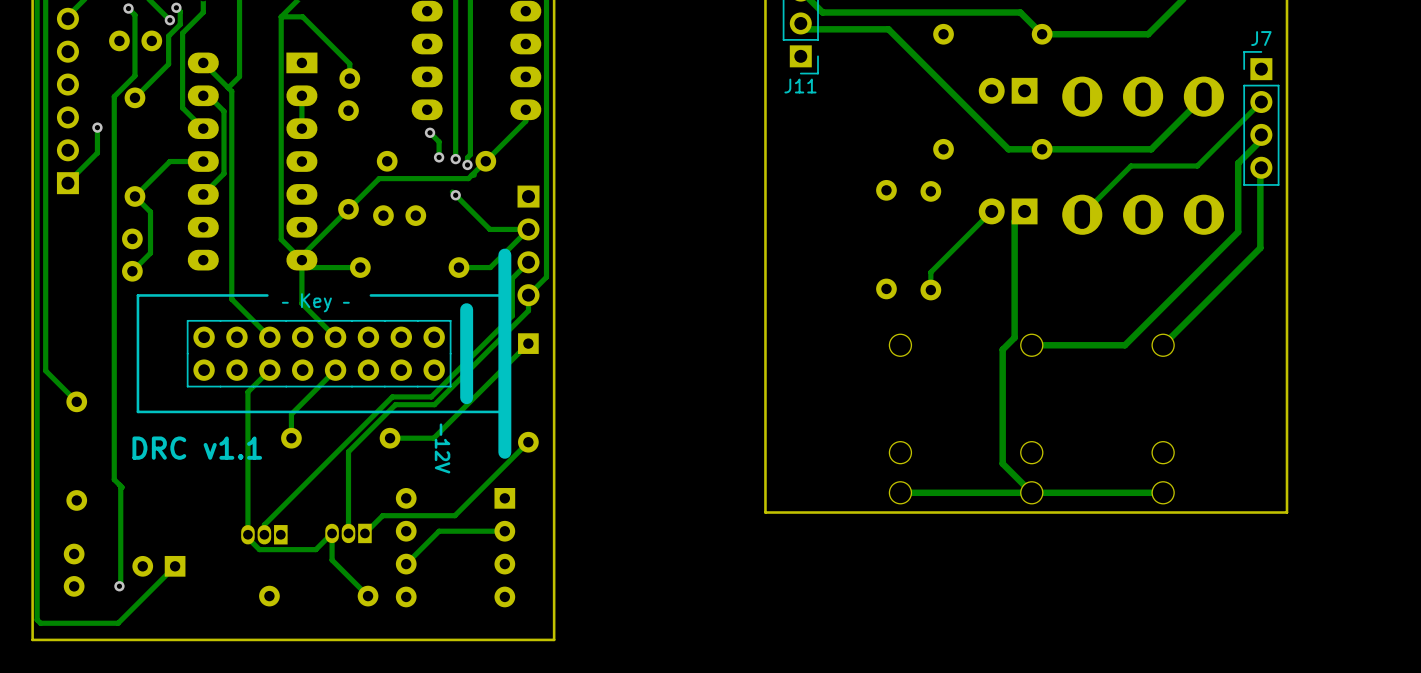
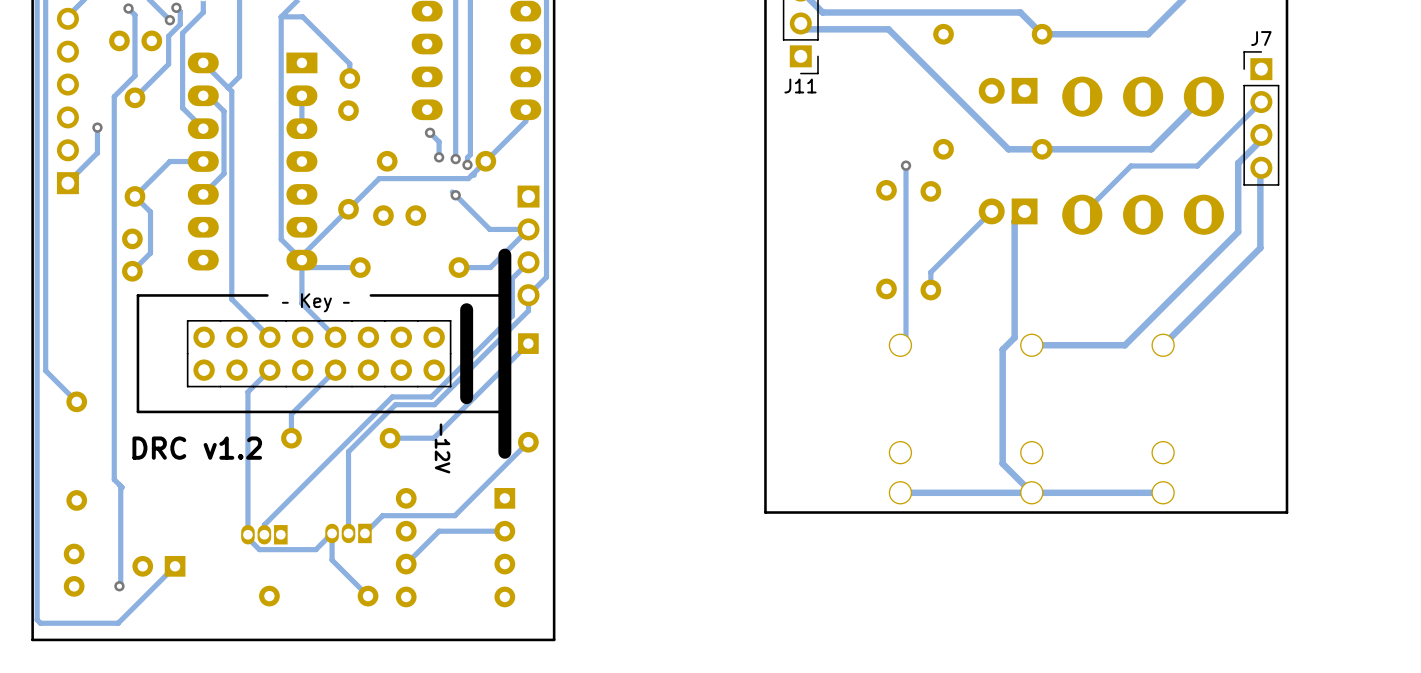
track: none -> (906, 165) (906, 339) (900, 345)
via: none -> (906, 165)
text: DRC v1.1 (197, 448) -> DRC v1.2 (197, 448)

